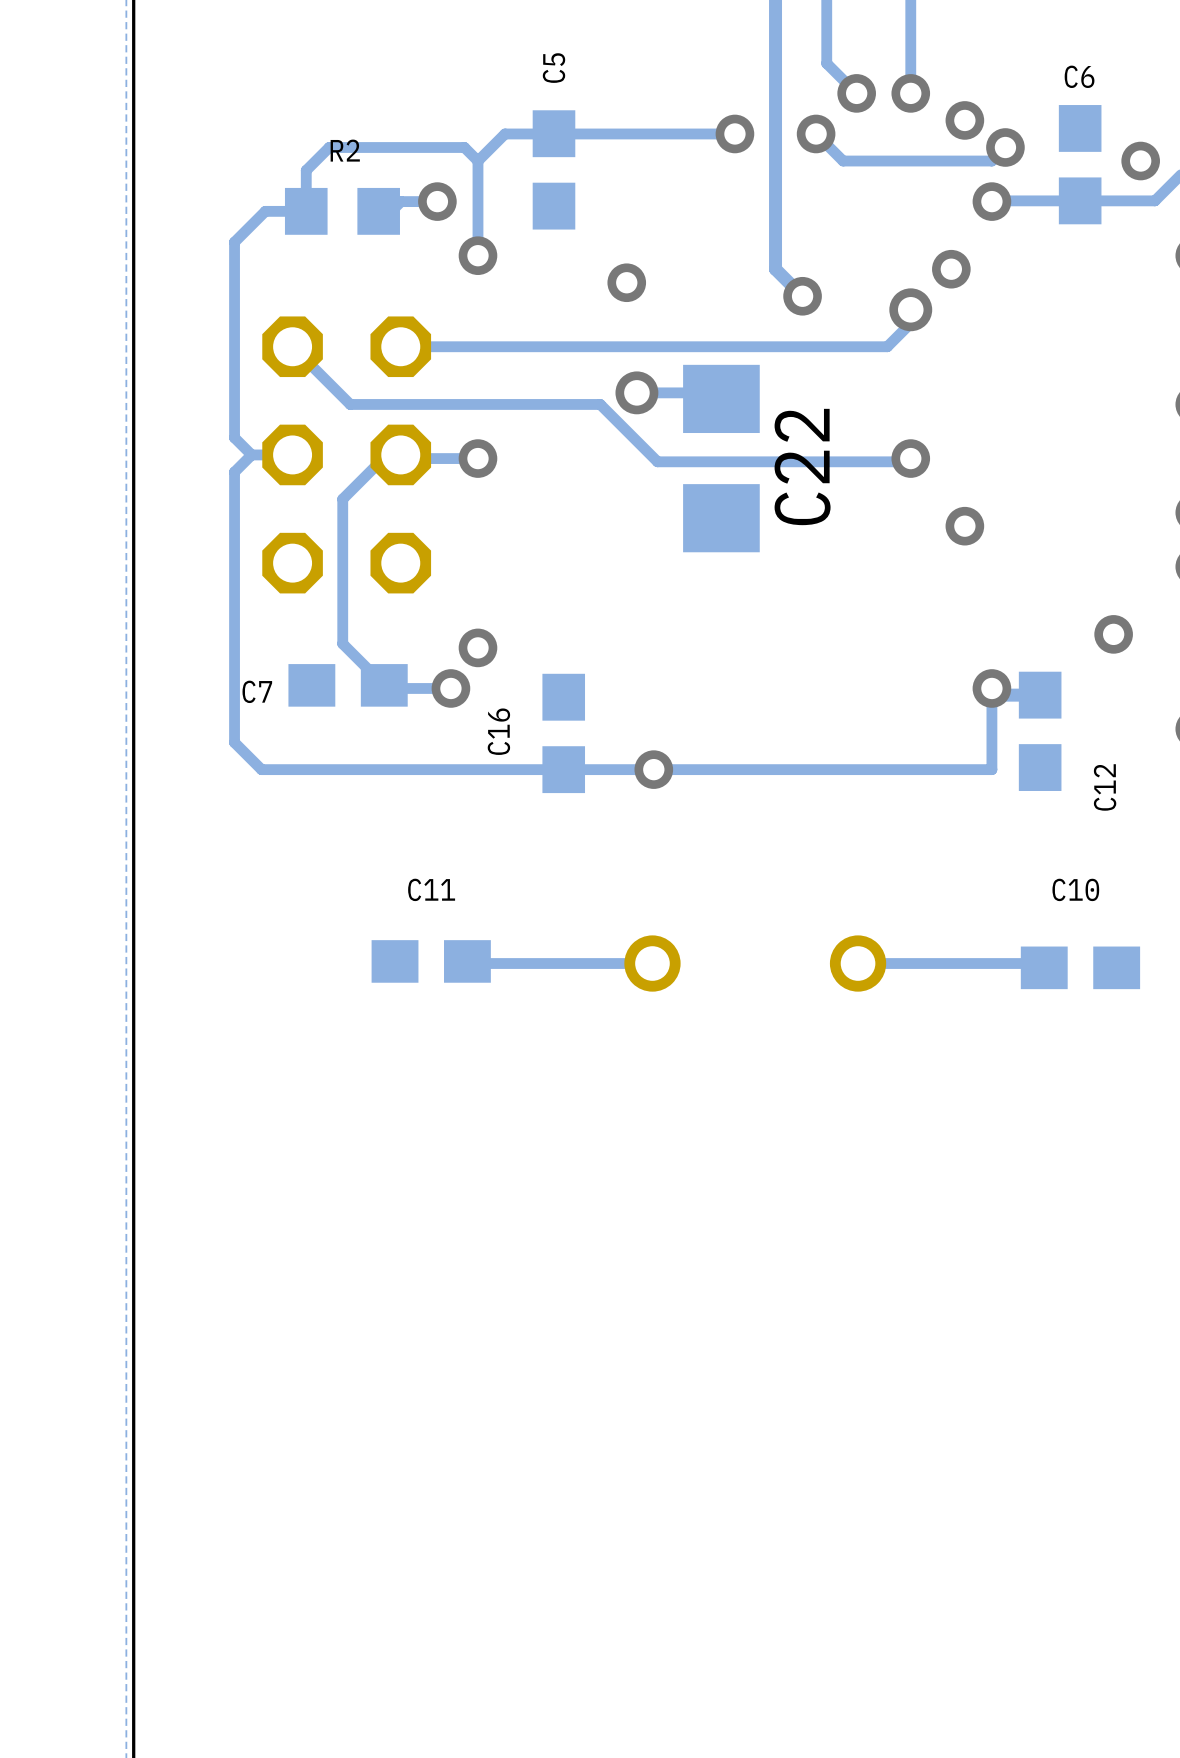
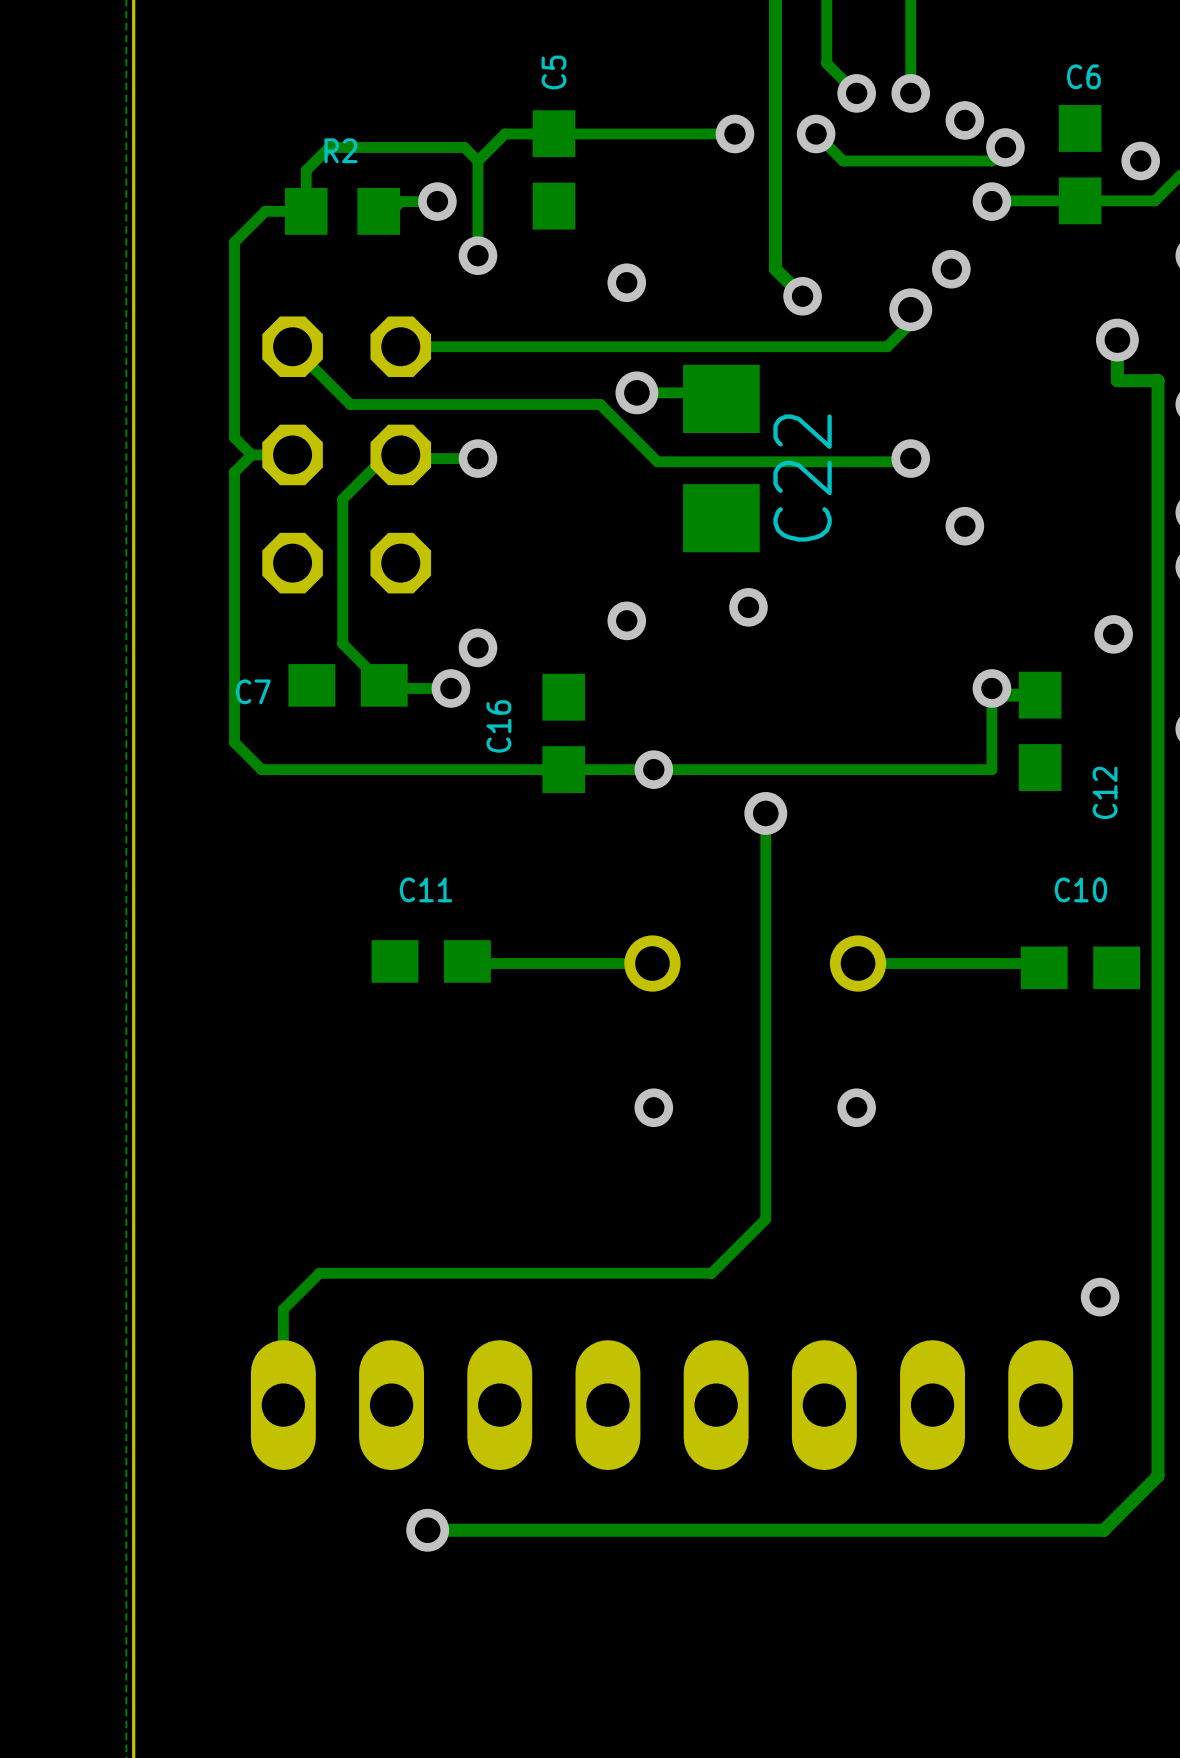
track: none -> (1117, 340) (1117, 380) (1157, 380) (1157, 1476) (1103, 1530) (427, 1530)
via: none -> (1117, 340)
via: none -> (748, 607)
via: none -> (626, 620)
track: none -> (765, 813) (765, 1219) (711, 1273) (319, 1273) (283, 1309) (283, 1405)
via: none -> (765, 813)
via: none -> (653, 1107)
via: none -> (856, 1107)
via: none -> (1100, 1297)
part: none -> (662, 1405)
via: none -> (427, 1530)

